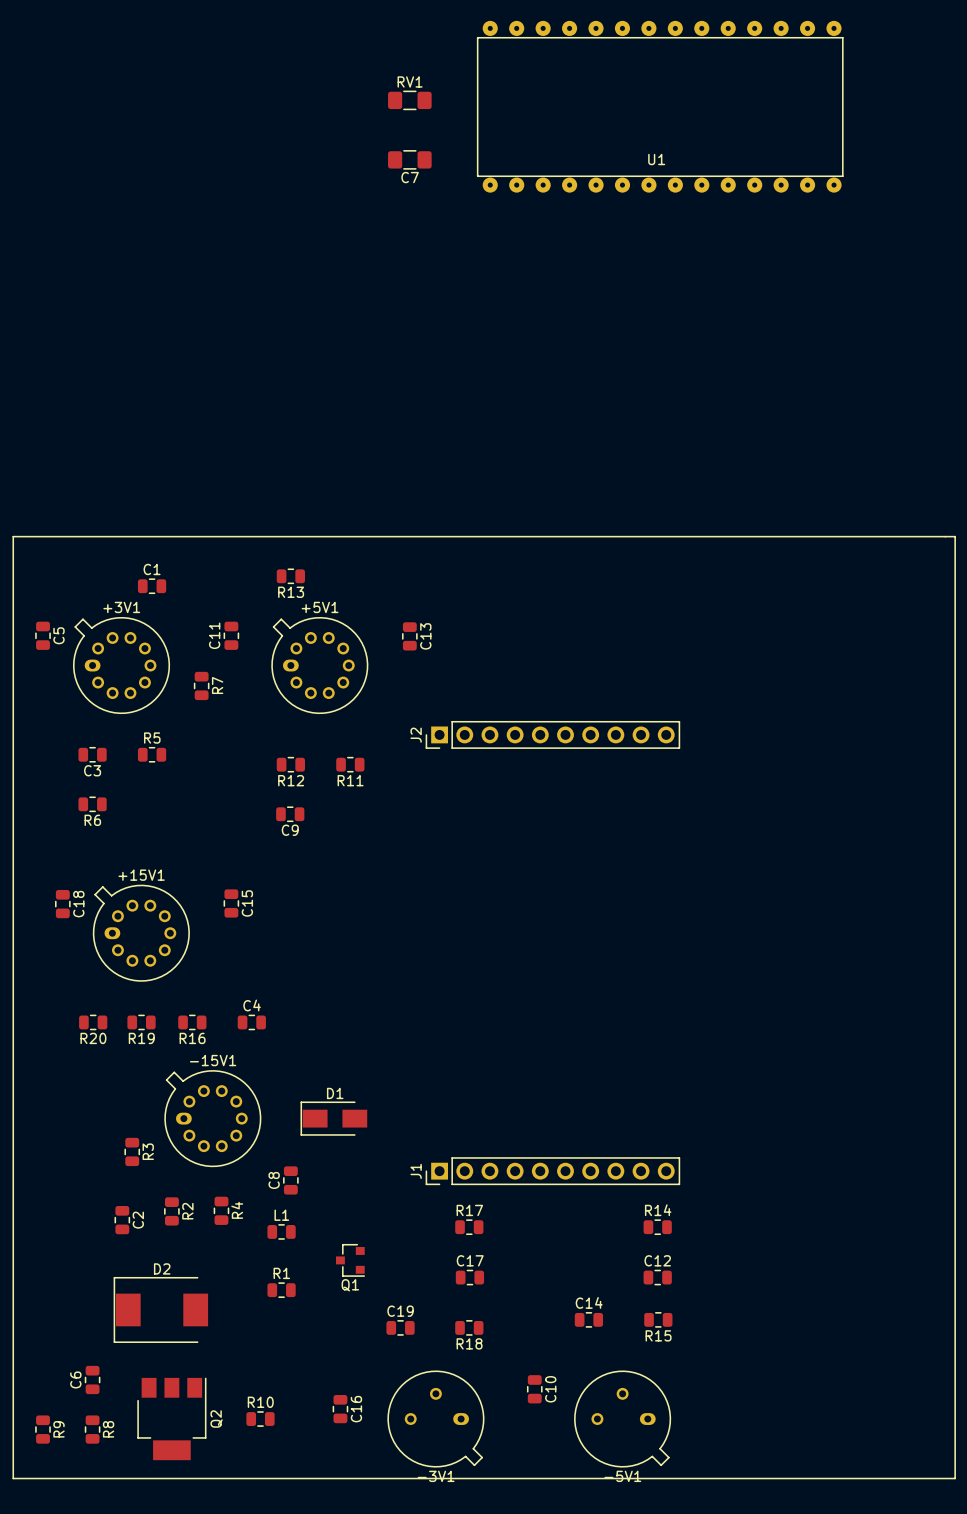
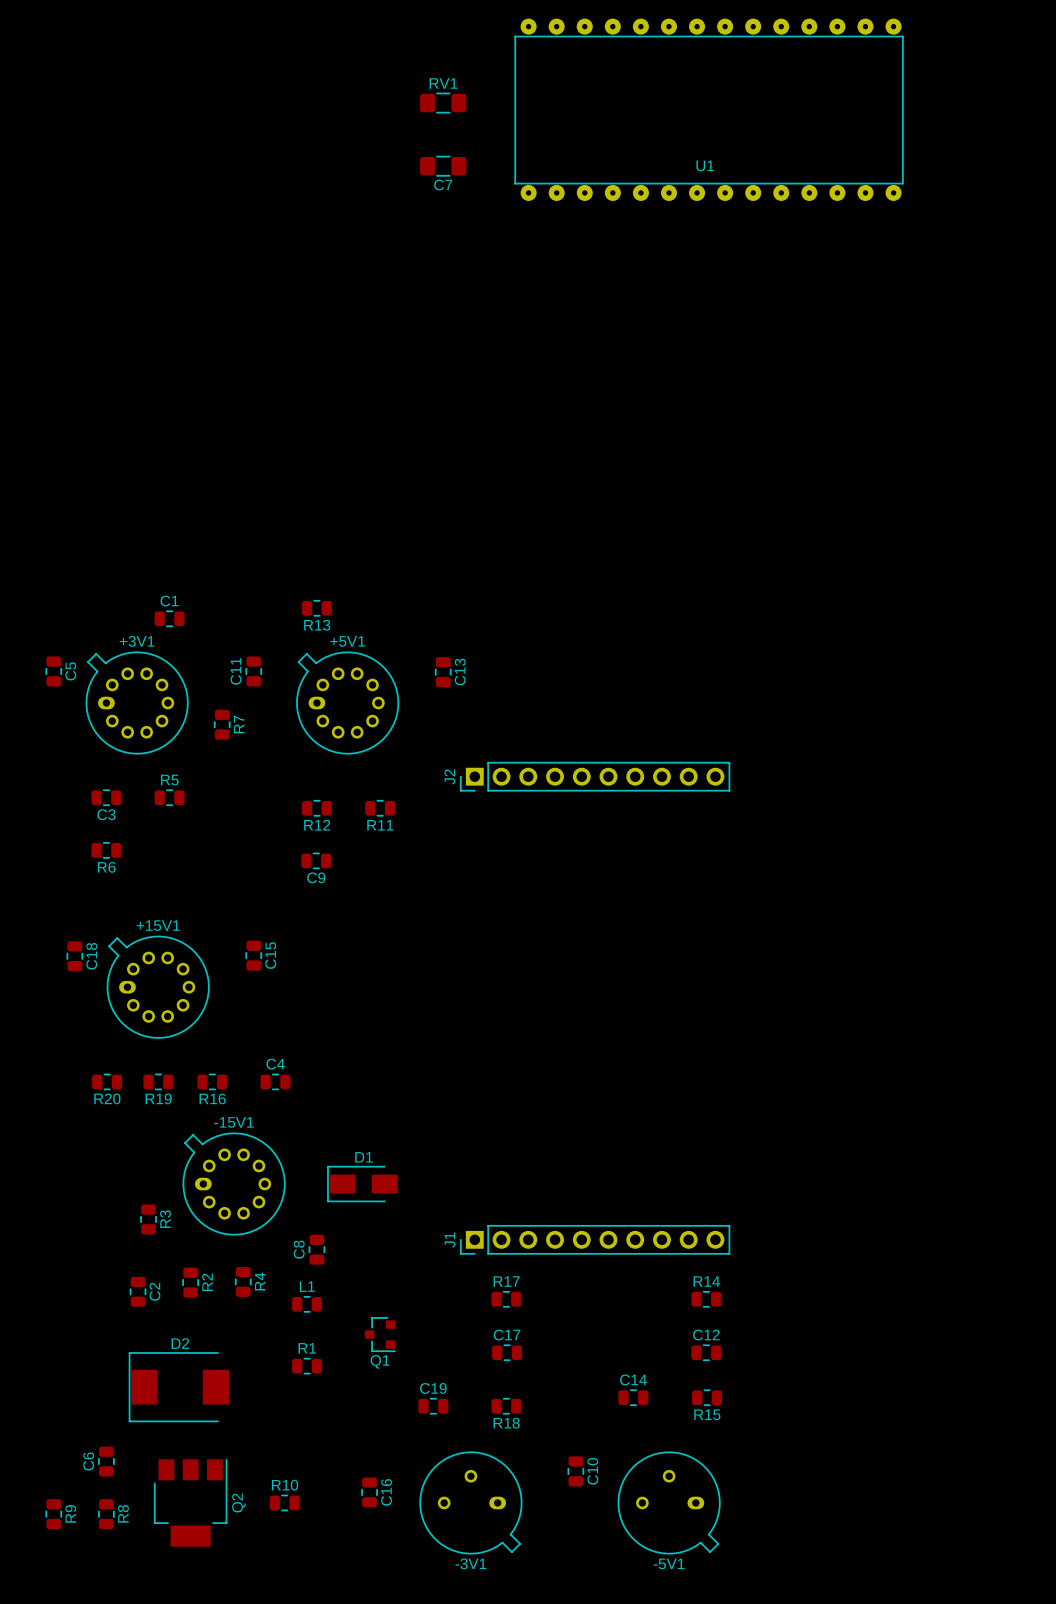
line: (13, 536) (955, 536) (955, 1478) (13, 1478) (13, 536) -> none

